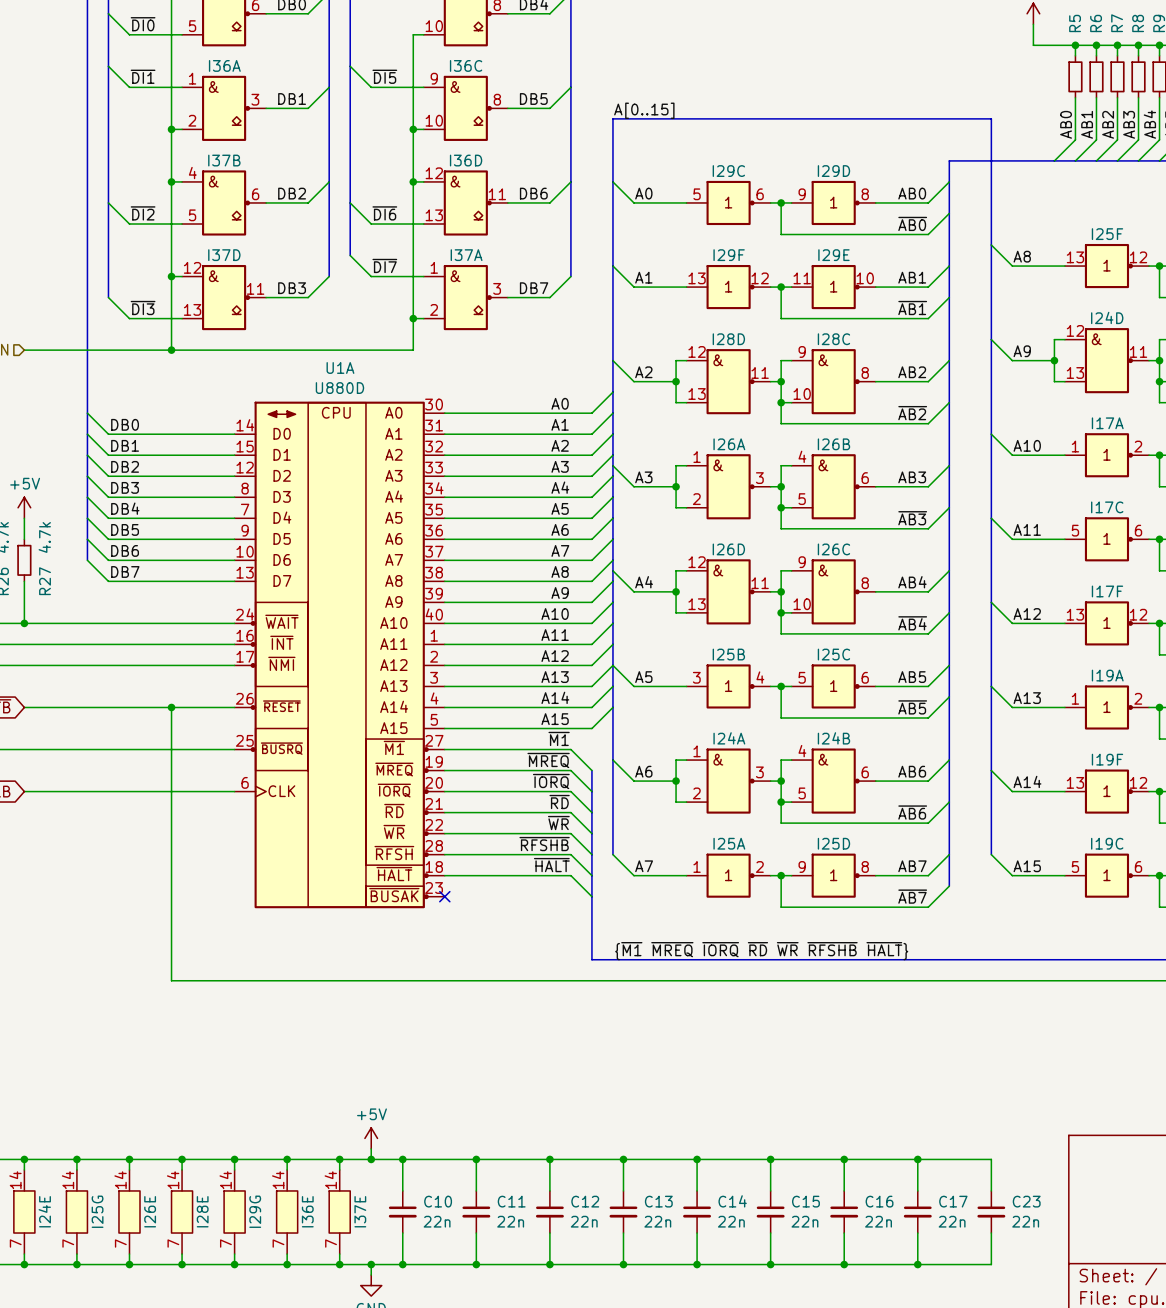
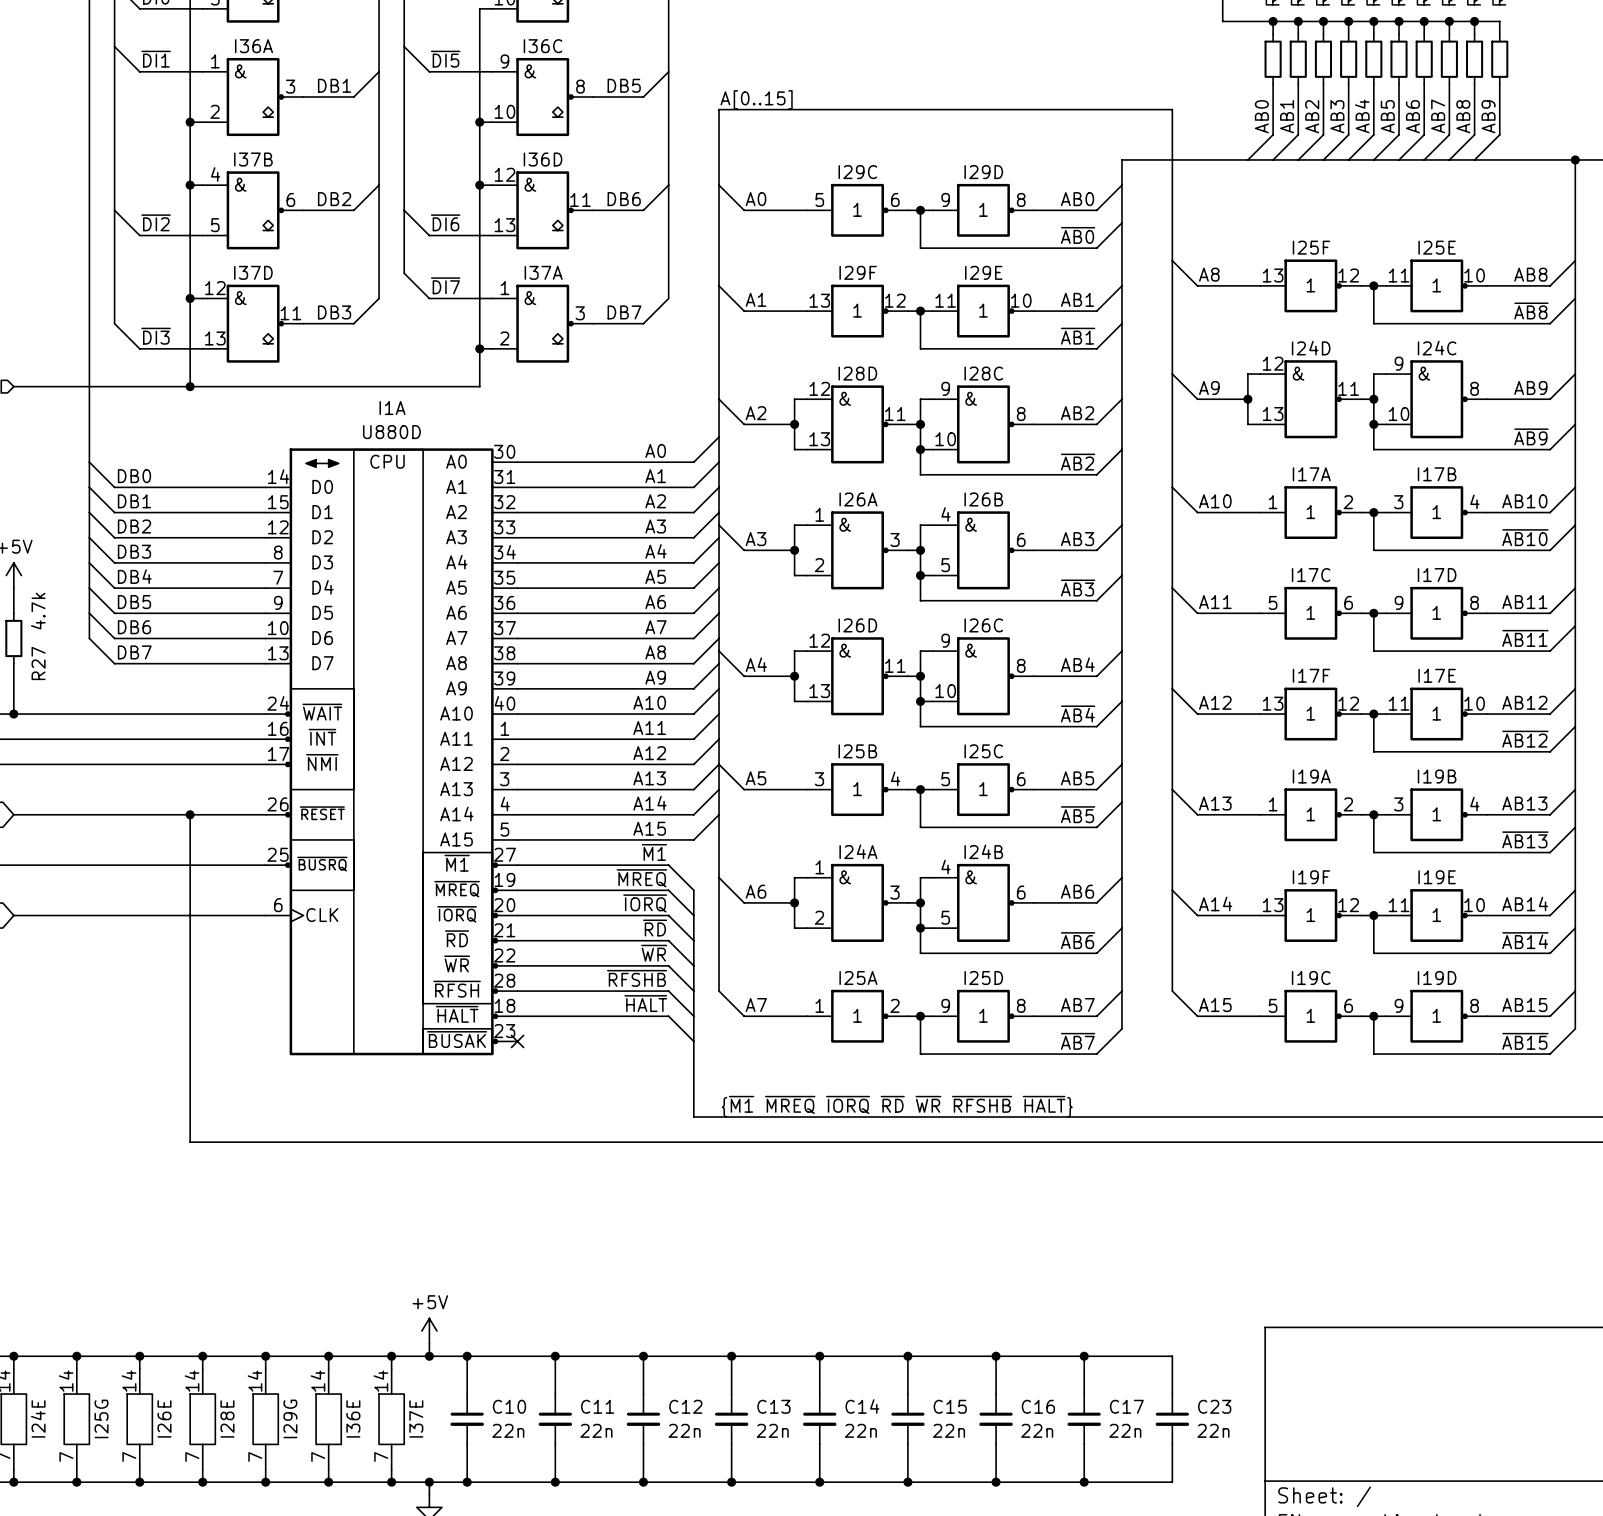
U1A name: U1A (340, 367) -> I1A (392, 408)

